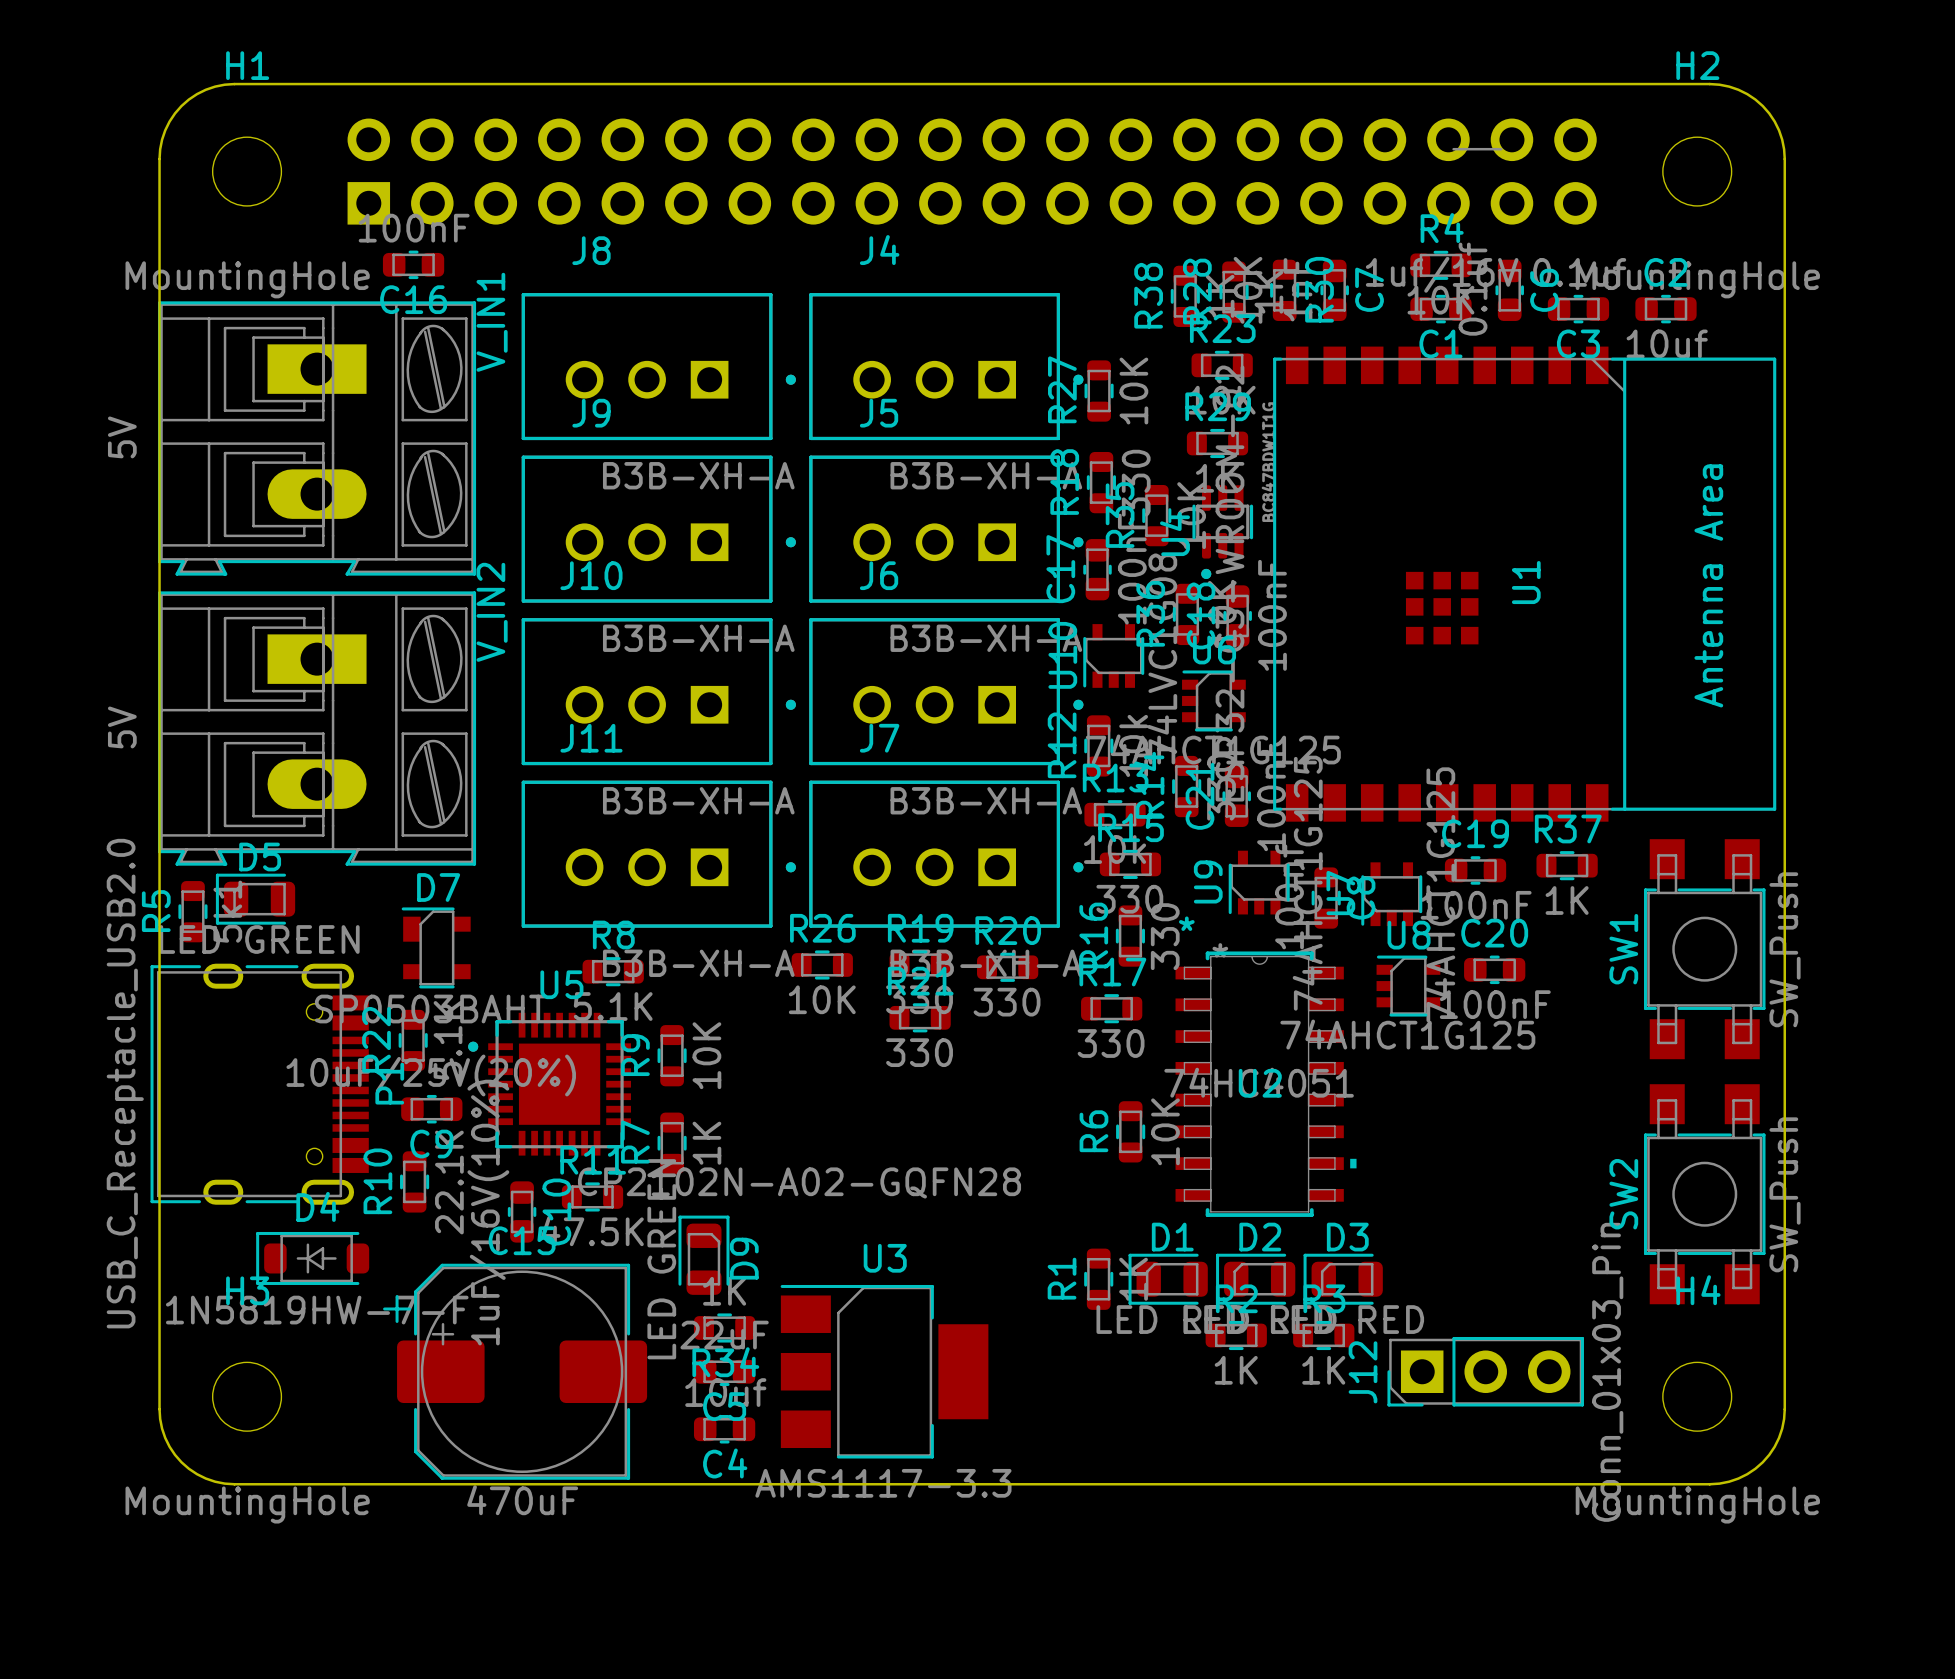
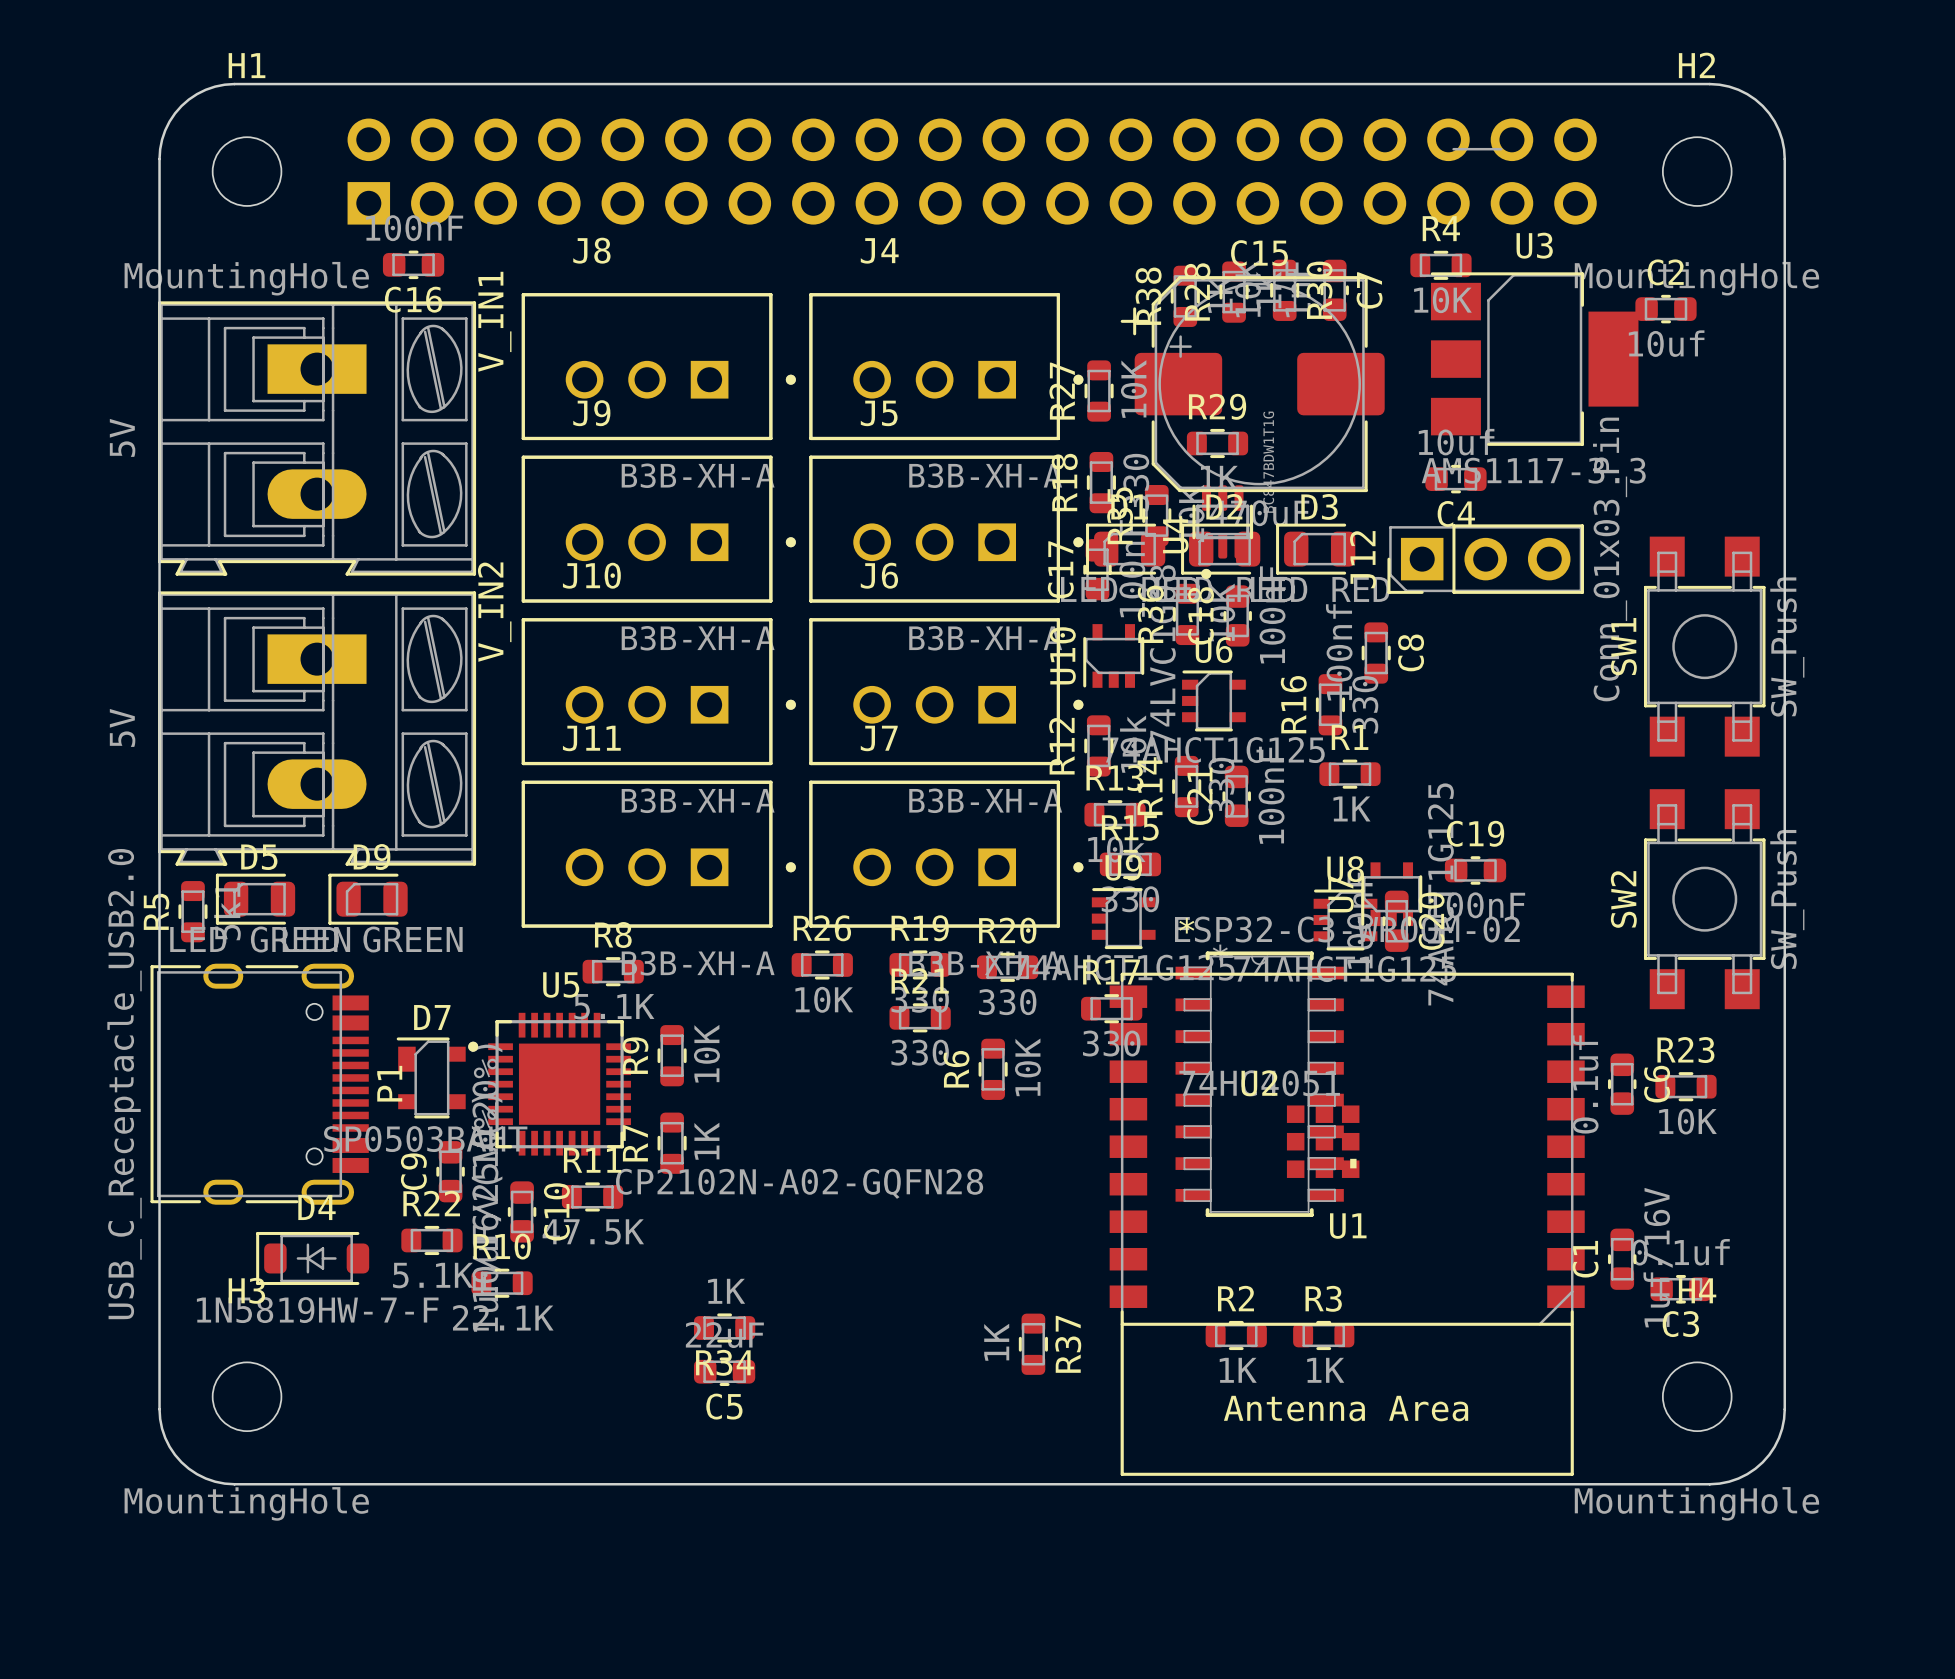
C6 position: (1509, 290) -> (1622, 1084)
C1 rotation: 0° (1440, 309) -> 90° clockwise (1622, 1259)
C1 position: (1440, 309) -> (1622, 1259)
C3 position: (1578, 309) -> (1680, 1289)
R23 position: (1222, 365) -> (1685, 1086)
U1 rotation: 0° (1524, 584) -> 90° clockwise (1347, 1224)
U1 position: (1524, 584) -> (1347, 1224)
R37 rotation: 0° (1567, 865) -> 90° clockwise (1033, 1344)
R37 position: (1567, 865) -> (1033, 1344)
U9 rotation: 0° (1259, 882) -> 90° clockwise (1123, 918)
U9 position: (1259, 882) -> (1123, 918)
C8 position: (1326, 898) -> (1376, 653)
R16 position: (1130, 936) -> (1330, 704)
D7 position: (436, 947) -> (431, 1077)
SW1 position: (1704, 949) -> (1704, 646)
C20 rotation: 0° (1494, 969) -> 90° clockwise (1396, 921)
C20 position: (1494, 969) -> (1396, 921)
U8 position: (1408, 986) -> (1345, 920)
R22 rotation: 0° (413, 1040) -> 90° clockwise (431, 1240)
R22 position: (413, 1040) -> (431, 1240)
C9 rotation: 0° (431, 1109) -> 90° clockwise (450, 1171)
C9 position: (431, 1109) -> (450, 1171)
R6 position: (1130, 1131) -> (993, 1069)
R10 rotation: 0° (414, 1181) -> 90° clockwise (502, 1283)
R10 position: (414, 1181) -> (502, 1283)
SW2 position: (1704, 1194) -> (1704, 899)
D9 rotation: 0° (703, 1255) -> 90° counterclockwise (368, 899)
D9 position: (703, 1255) -> (368, 899)
R1 rotation: 0° (1098, 1279) -> 90° clockwise (1350, 774)
R1 position: (1098, 1279) -> (1350, 774)
D1 position: (1168, 1279) -> (1125, 549)
D2 position: (1255, 1279) -> (1220, 549)
D3 position: (1343, 1279) -> (1315, 549)
C15 position: (515, 1371) -> (1252, 384)
U3 position: (884, 1371) -> (1534, 359)
J12 position: (1485, 1371) -> (1485, 559)
C4 position: (724, 1429) -> (1455, 479)

